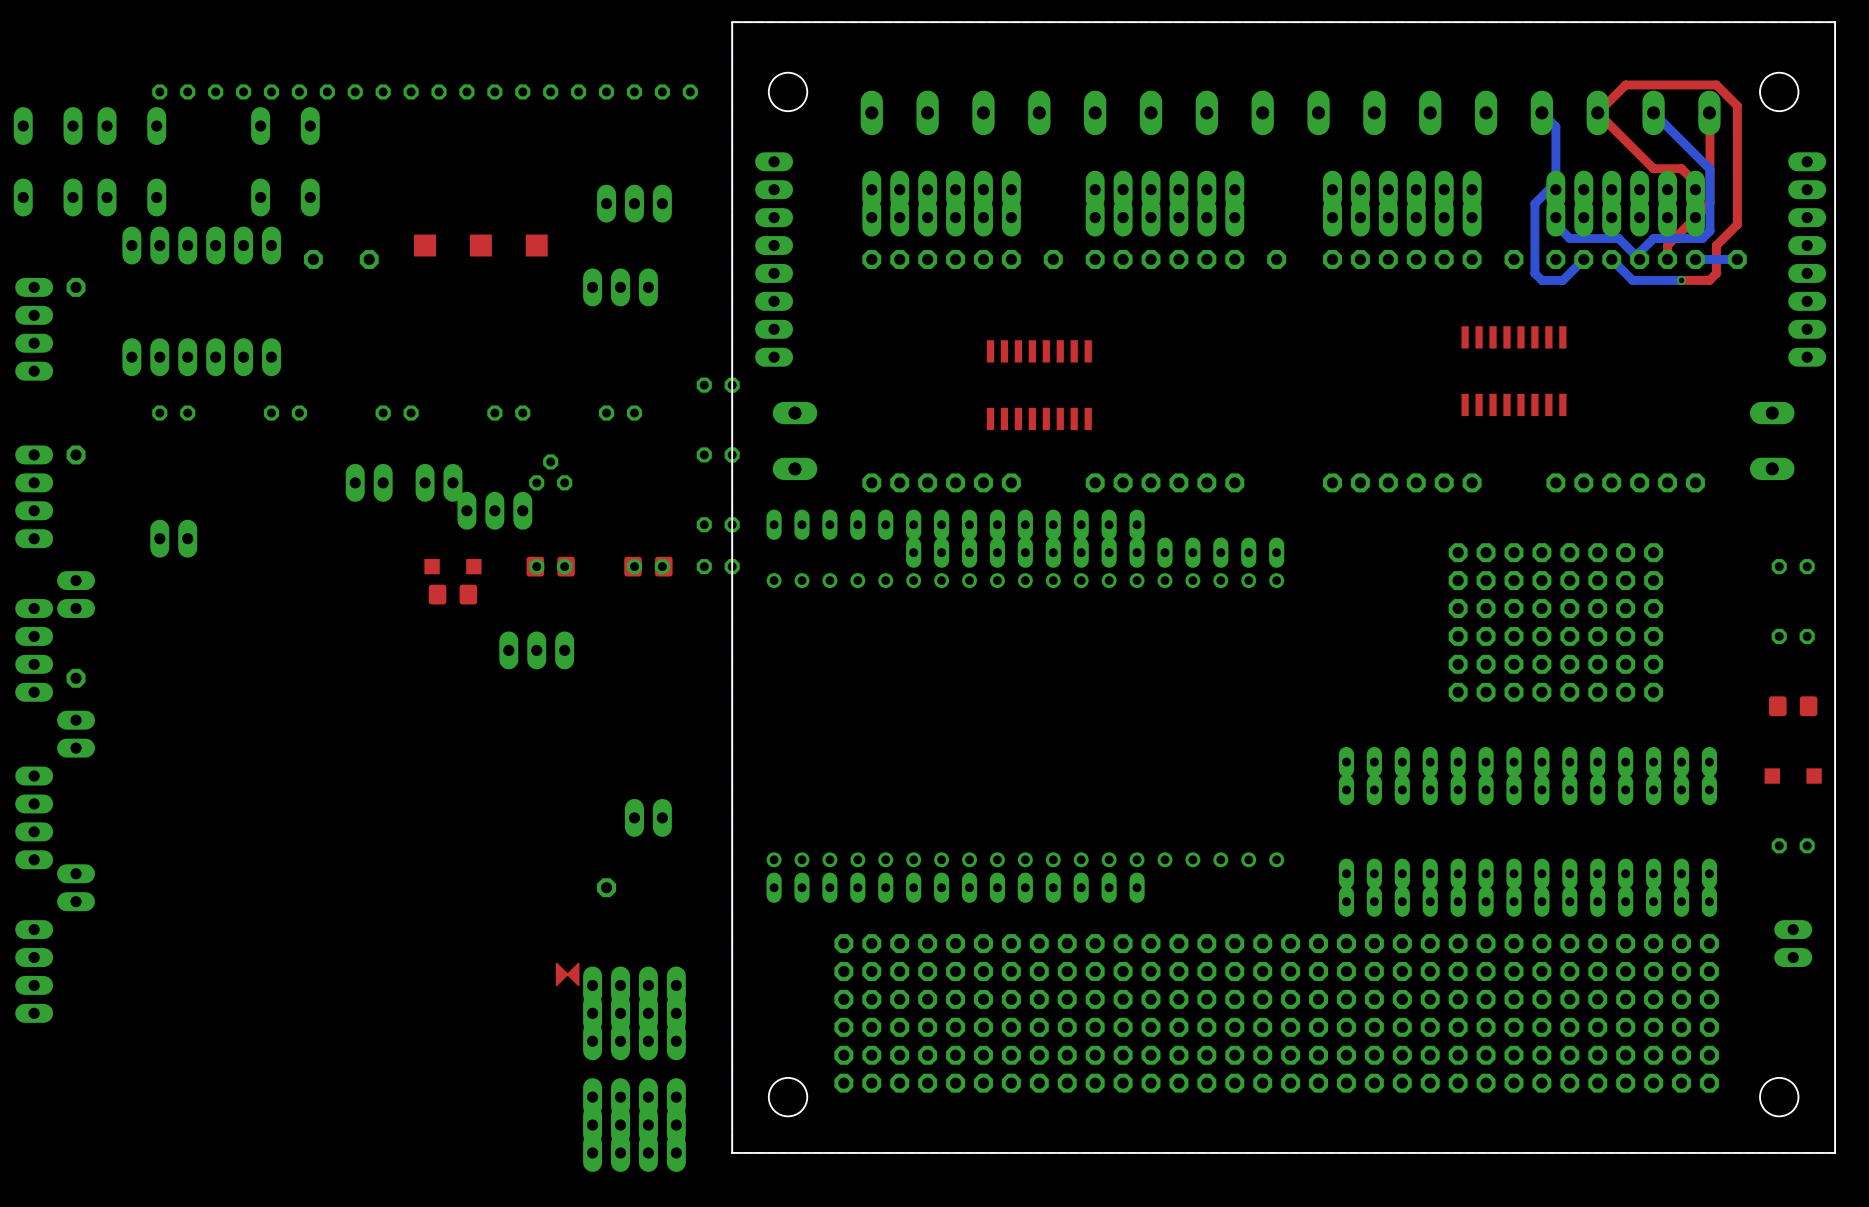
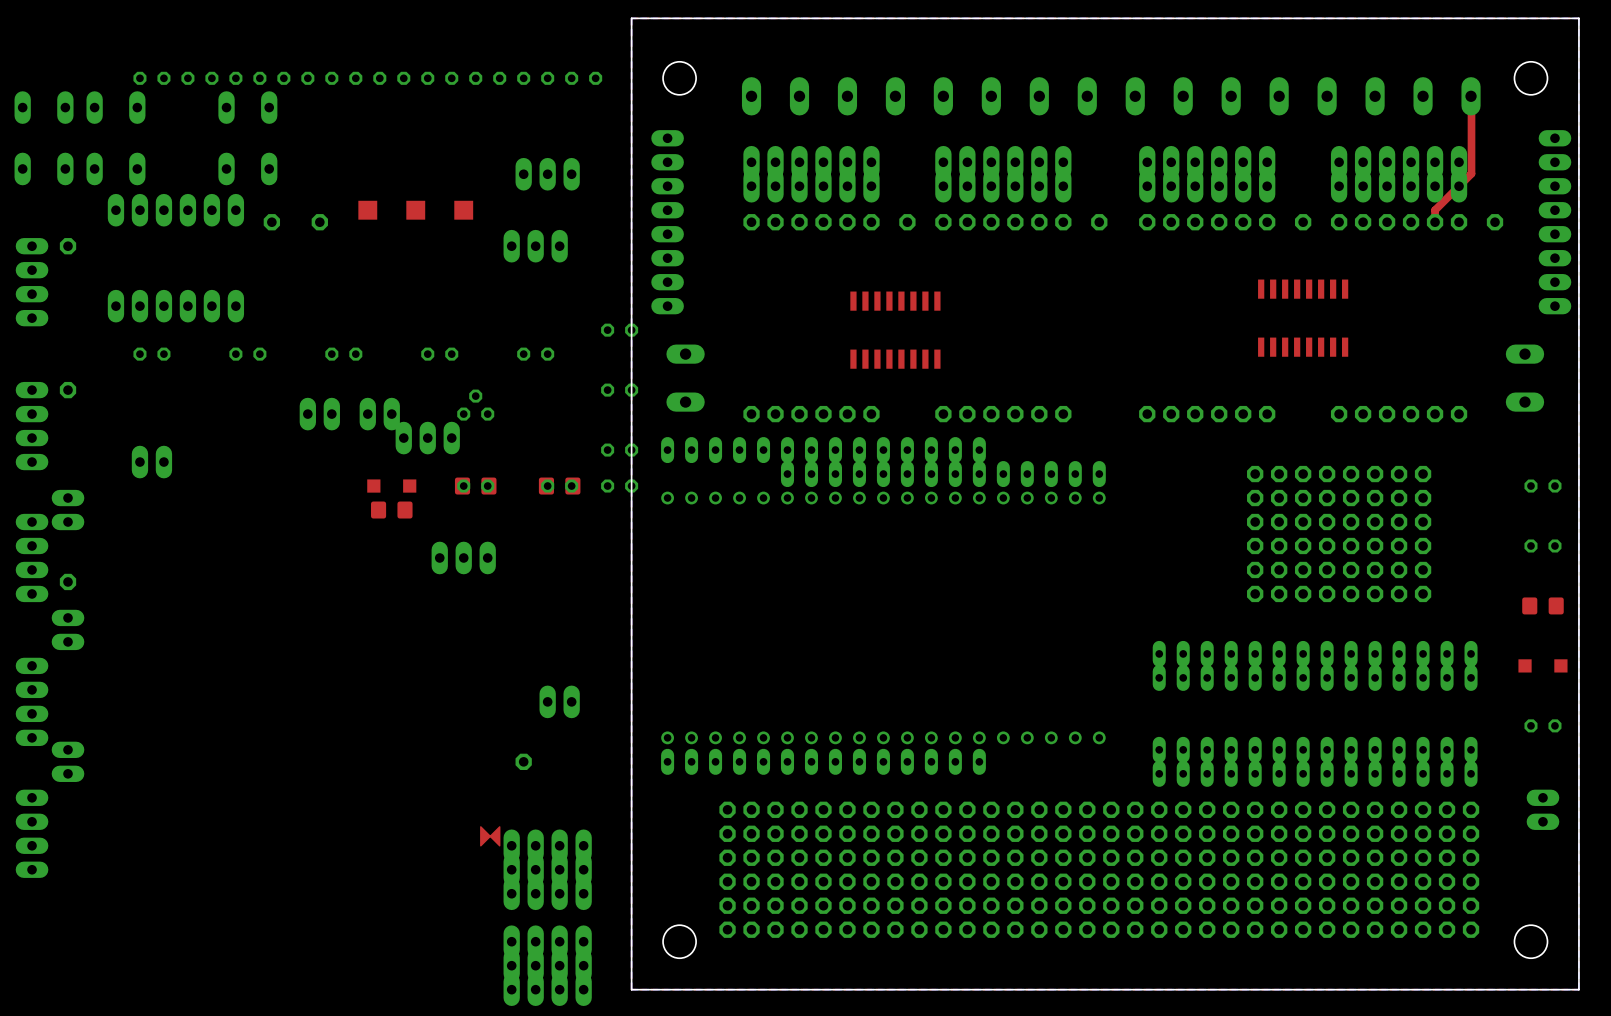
bottom track: (1541, 112) (1555, 126) (1555, 189) (1548, 189) (1534, 203) (1534, 273) (1541, 280) (1562, 280) (1583, 259) -> none
bottom track: (1653, 112) (1710, 169) (1710, 231) (1702, 238) (1653, 238) (1639, 252) (1639, 259) (1618, 238) (1569, 238) (1555, 224) (1555, 217) -> none
top track: (1695, 189) (1695, 182) (1681, 168) (1653, 168) (1597, 112) (1625, 84) (1716, 84) (1737, 105) (1737, 224) (1716, 245) (1716, 273) (1709, 280) (1681, 280) -> none
bottom track: (1611, 259) (1632, 280) (1681, 280) -> none
bottom track: (1737, 259) (1695, 259) -> none
via: (1681, 280) -> none

